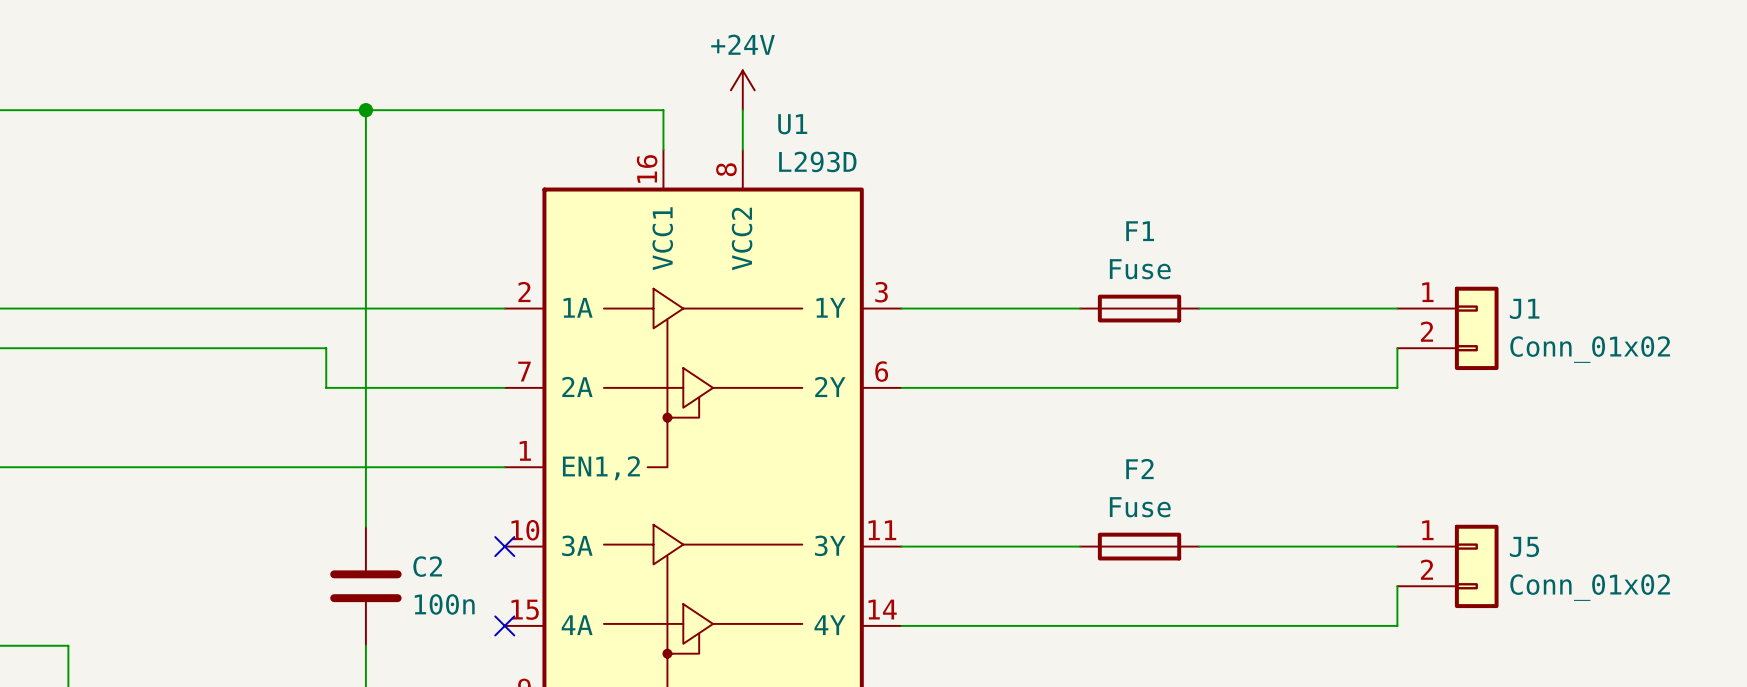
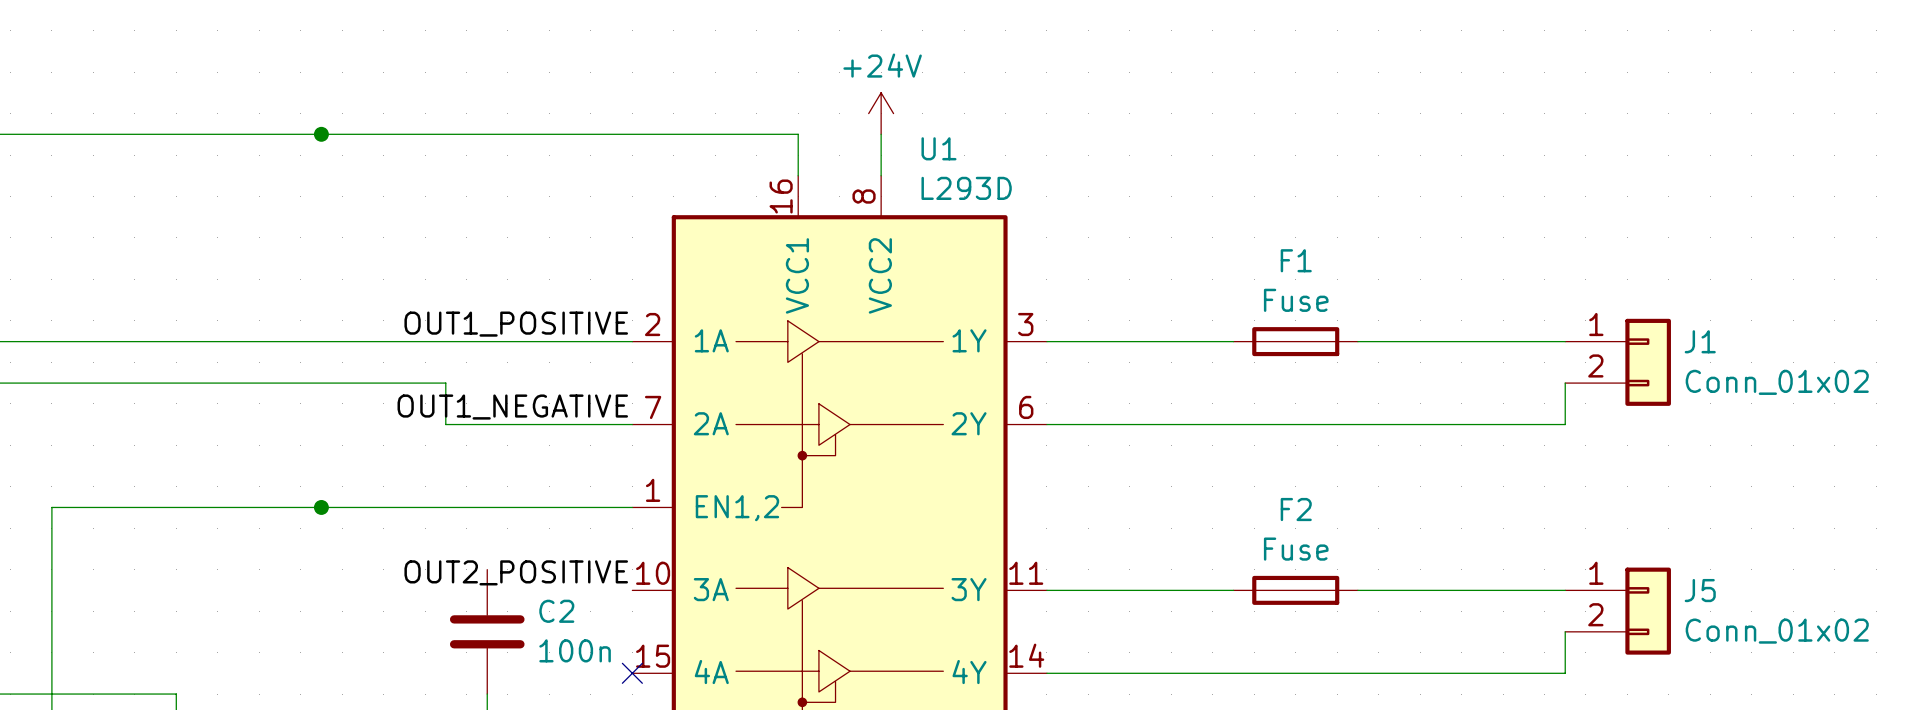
junction: none -> (321, 134)
wire: (365, 110) (365, 526) -> none
junction: (365, 110) -> none
label: none -> OUT1_POSITIVE (516, 324)
label: none -> OUT1_NEGATIVE (512, 407)
junction: none -> (321, 507)
label: none -> OUT2_POSITIVE (516, 572)
no-connect mark: (504, 546) -> none

